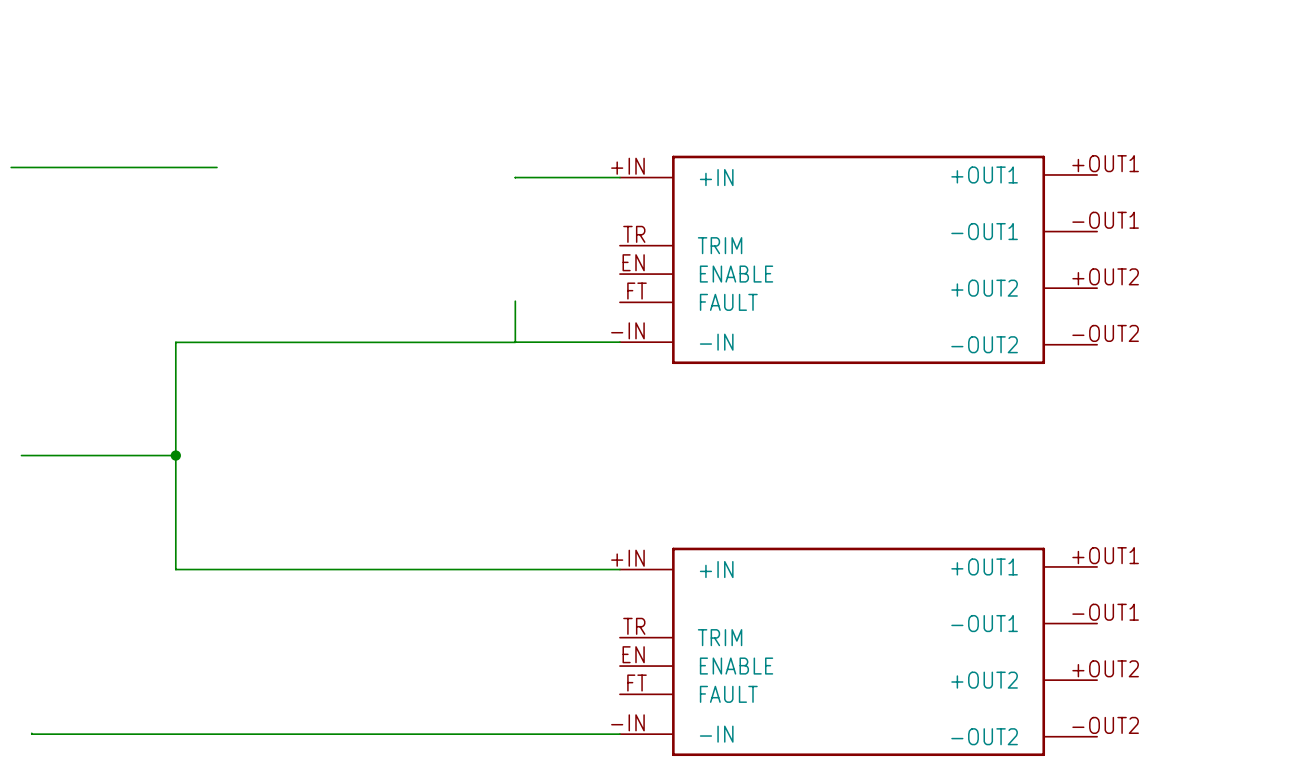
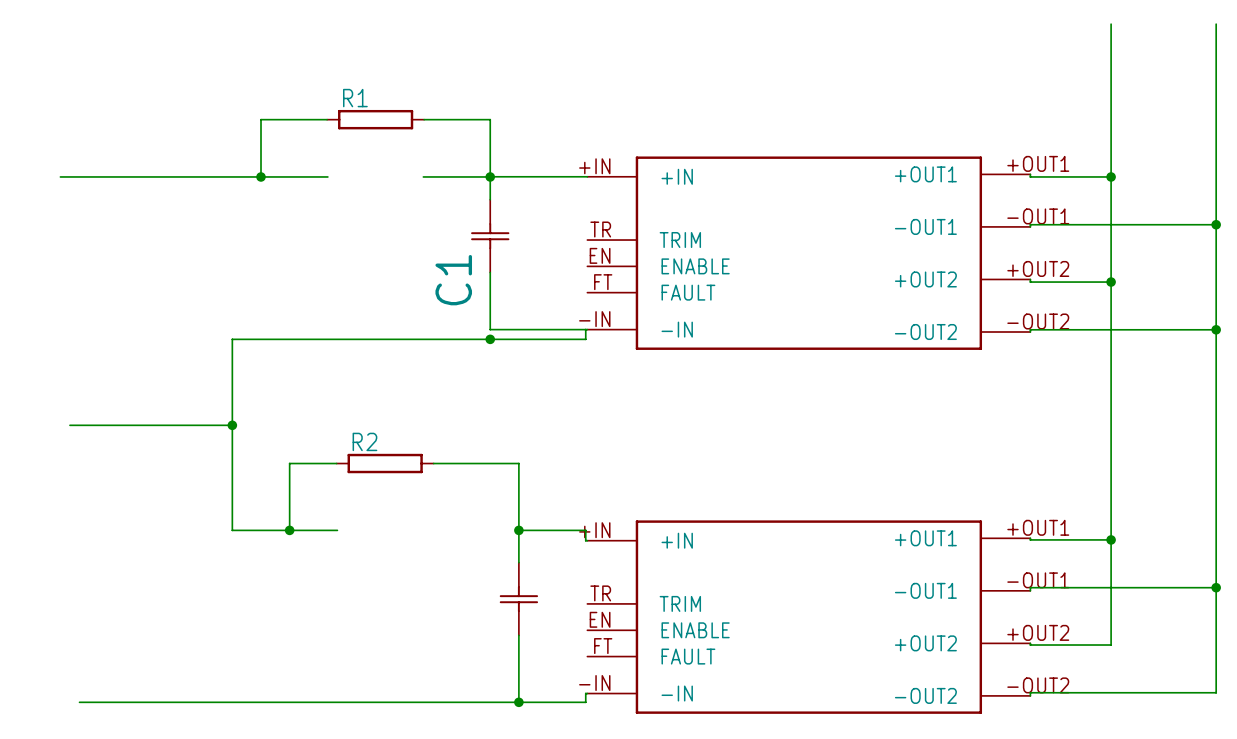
wire: none -> (1111, 24) (1111, 645) (1030, 645) (1030, 643)
wire: none -> (1216, 24) (1216, 692) (1030, 692) (1030, 695)
wire: none -> (327, 119) (261, 119) (261, 176)
R1: none -> (375, 119)
wire: none -> (424, 119) (490, 119) (490, 176)
wire: (11, 167) (216, 167) -> none
wire: none -> (1030, 174) (1030, 176) (1111, 176)
wire: none -> (60, 176) (327, 176)
junction: none -> (261, 176)
wire: none -> (423, 176) (490, 176) (490, 199)
junction: none -> (490, 176)
junction: none -> (1111, 176)
wire: none -> (1216, 224) (1030, 224) (1030, 226)
junction: none -> (1216, 224)
C1: none -> (490, 236)
wire: none -> (490, 272) (490, 291)
wire: none -> (1030, 279) (1030, 282) (1111, 282)
junction: none -> (1111, 282)
wire: (515, 342) (175, 342) (175, 569) (618, 569) -> (518, 530) (585, 530) (585, 540)
wire: none -> (585, 329) (585, 339) (232, 339) (232, 530) (337, 530)
wire: none -> (1216, 329) (1030, 329) (1030, 332)
junction: none -> (1216, 329)
junction: none -> (490, 339)
wire: none -> (69, 425) (232, 425)
junction: none -> (232, 425)
wire: (21, 455) (175, 455) -> none
junction: (175, 455) -> none
wire: none -> (336, 463) (289, 463) (289, 530)
R2: none -> (385, 463)
wire: none -> (433, 463) (518, 463) (518, 562)
junction: none -> (289, 530)
junction: none -> (518, 530)
wire: none -> (1030, 538) (1030, 539) (1111, 539)
junction: none -> (1111, 539)
wire: none -> (1216, 587) (1030, 587) (1030, 590)
junction: none -> (1216, 587)
part: none -> (518, 599)
wire: none -> (518, 635) (518, 702)
wire: (31, 733) (618, 734) -> (79, 702) (585, 702) (585, 693)
junction: none -> (518, 702)

